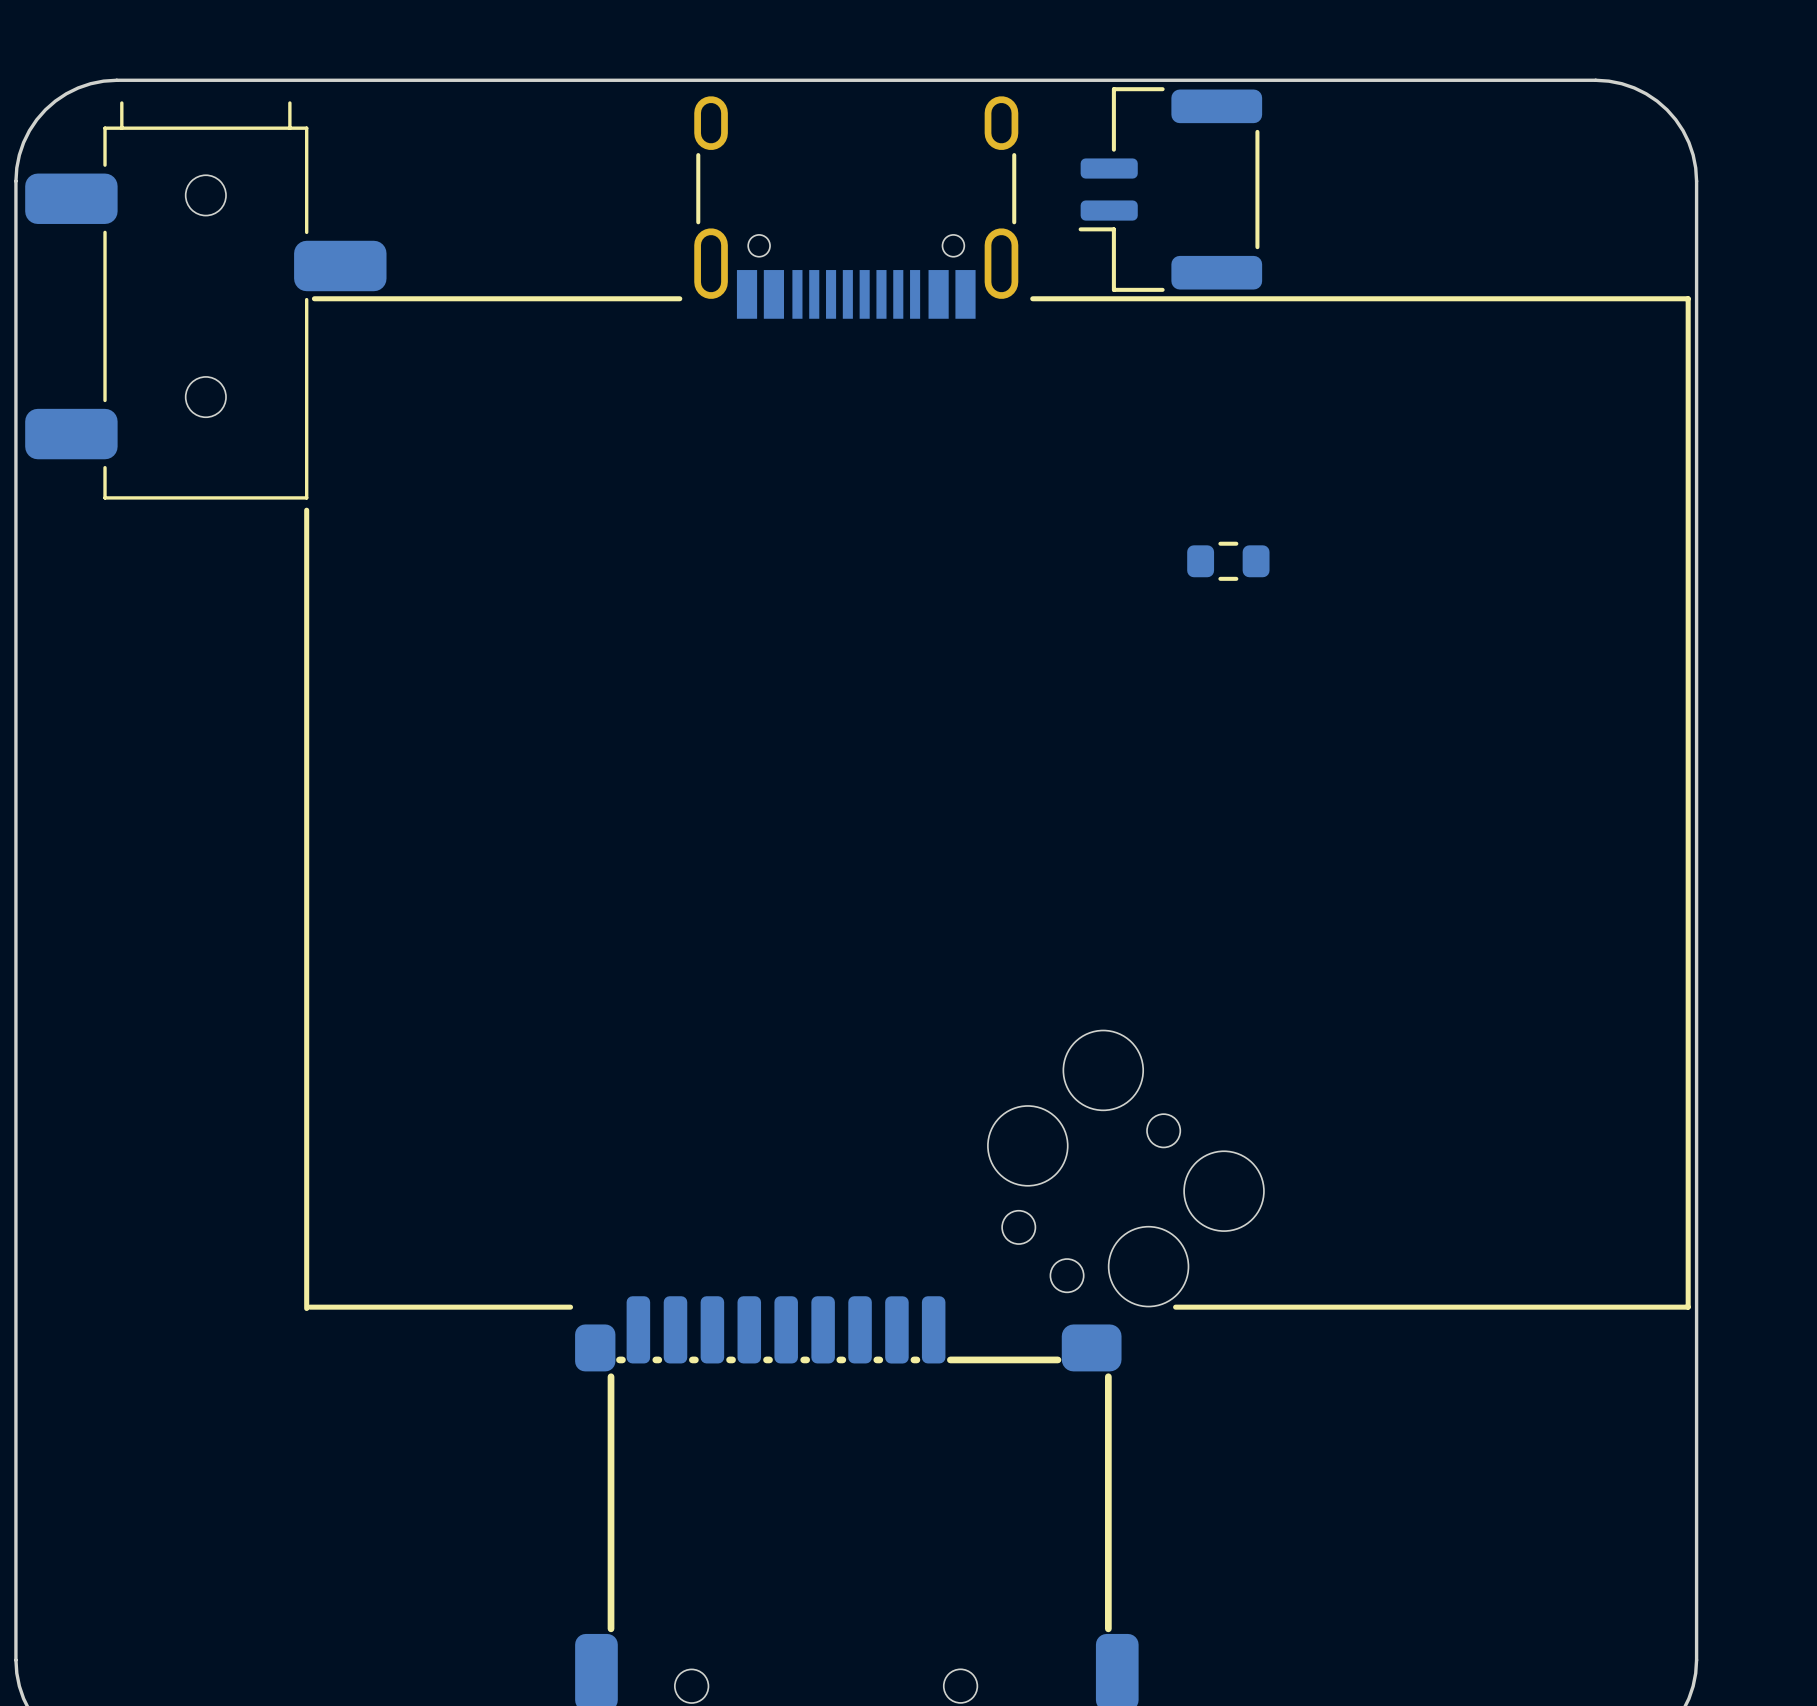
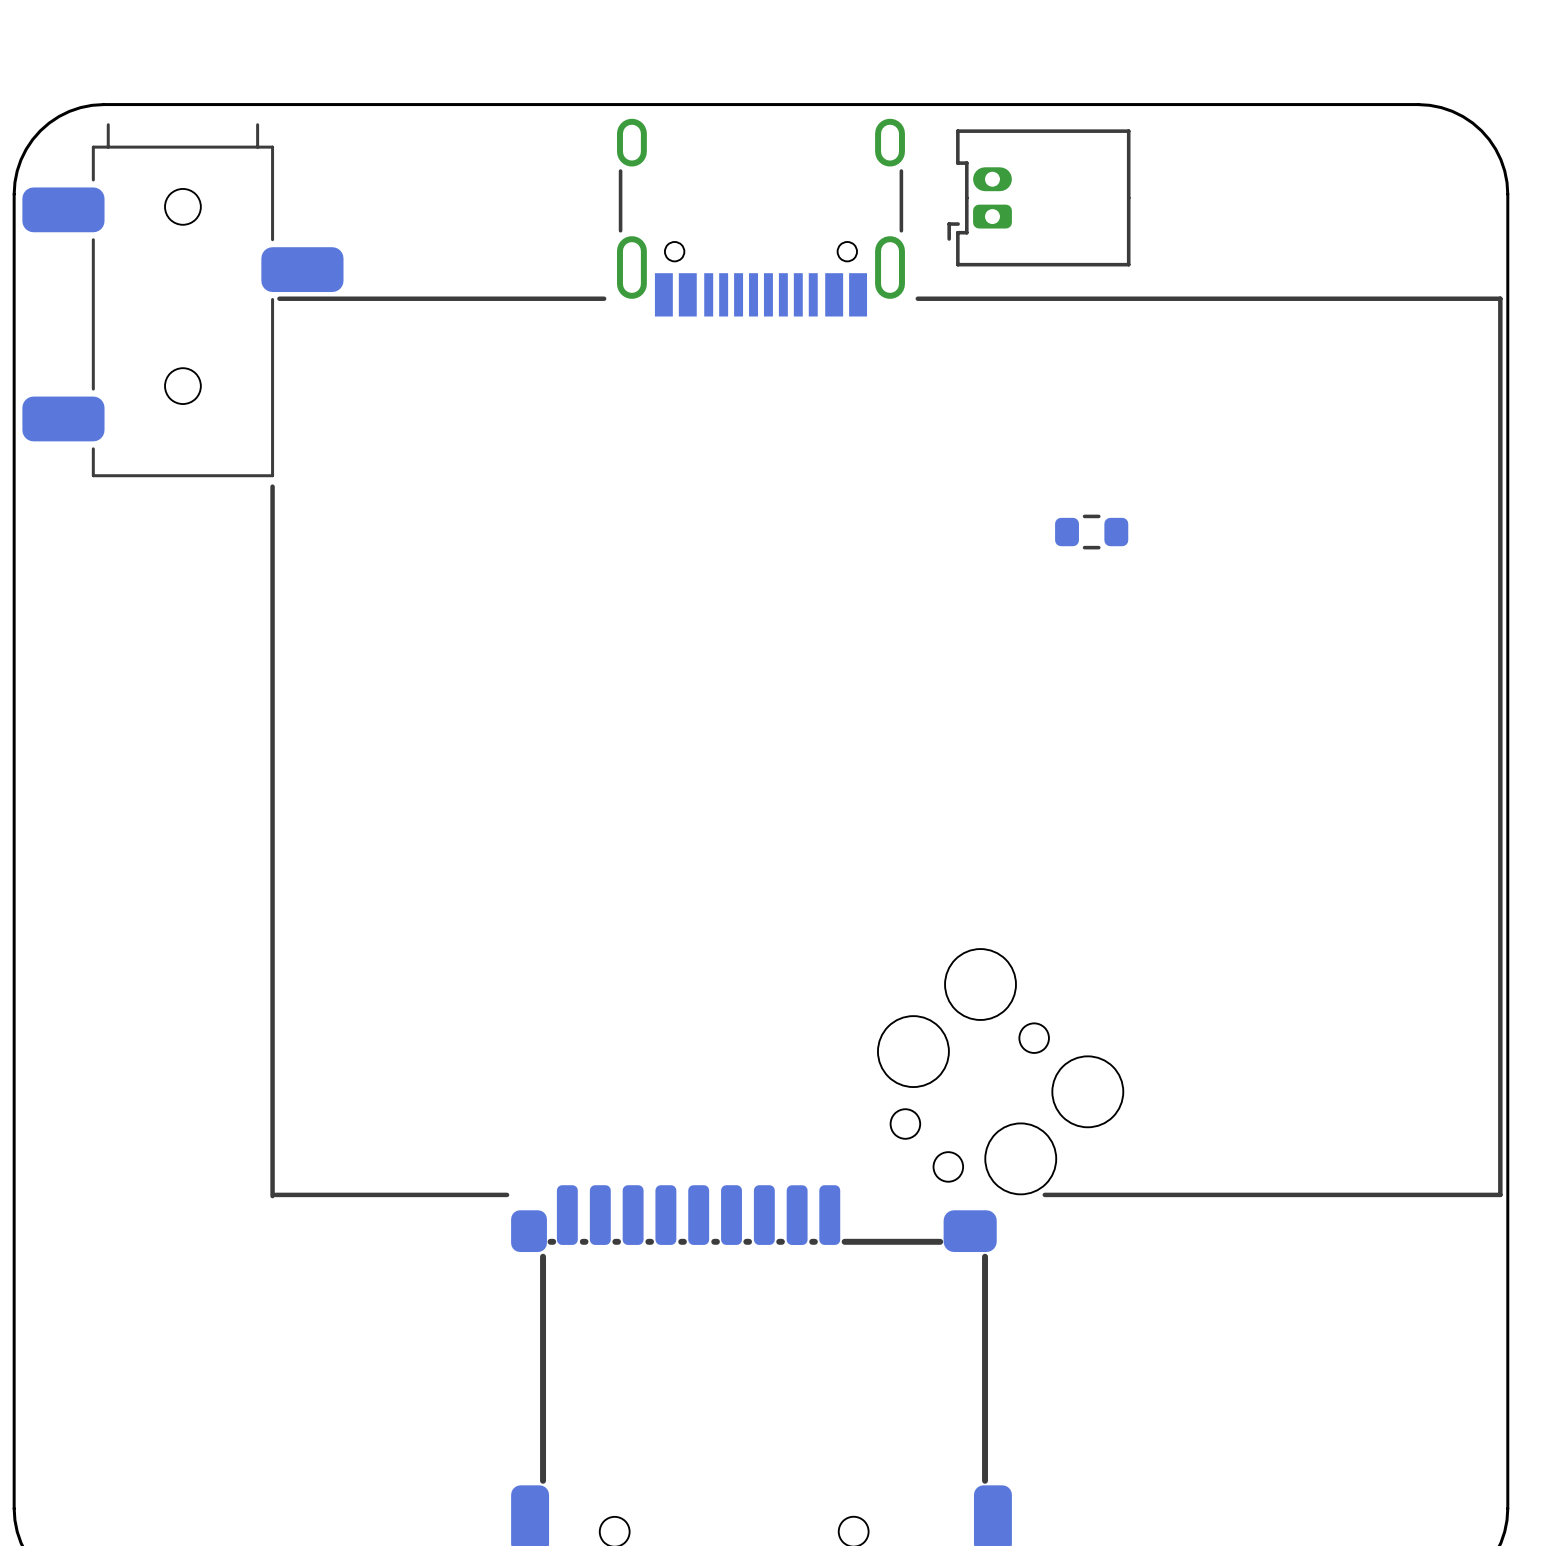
part footprint: [1078, 87, 1263, 292] -> [947, 129, 1131, 267]

